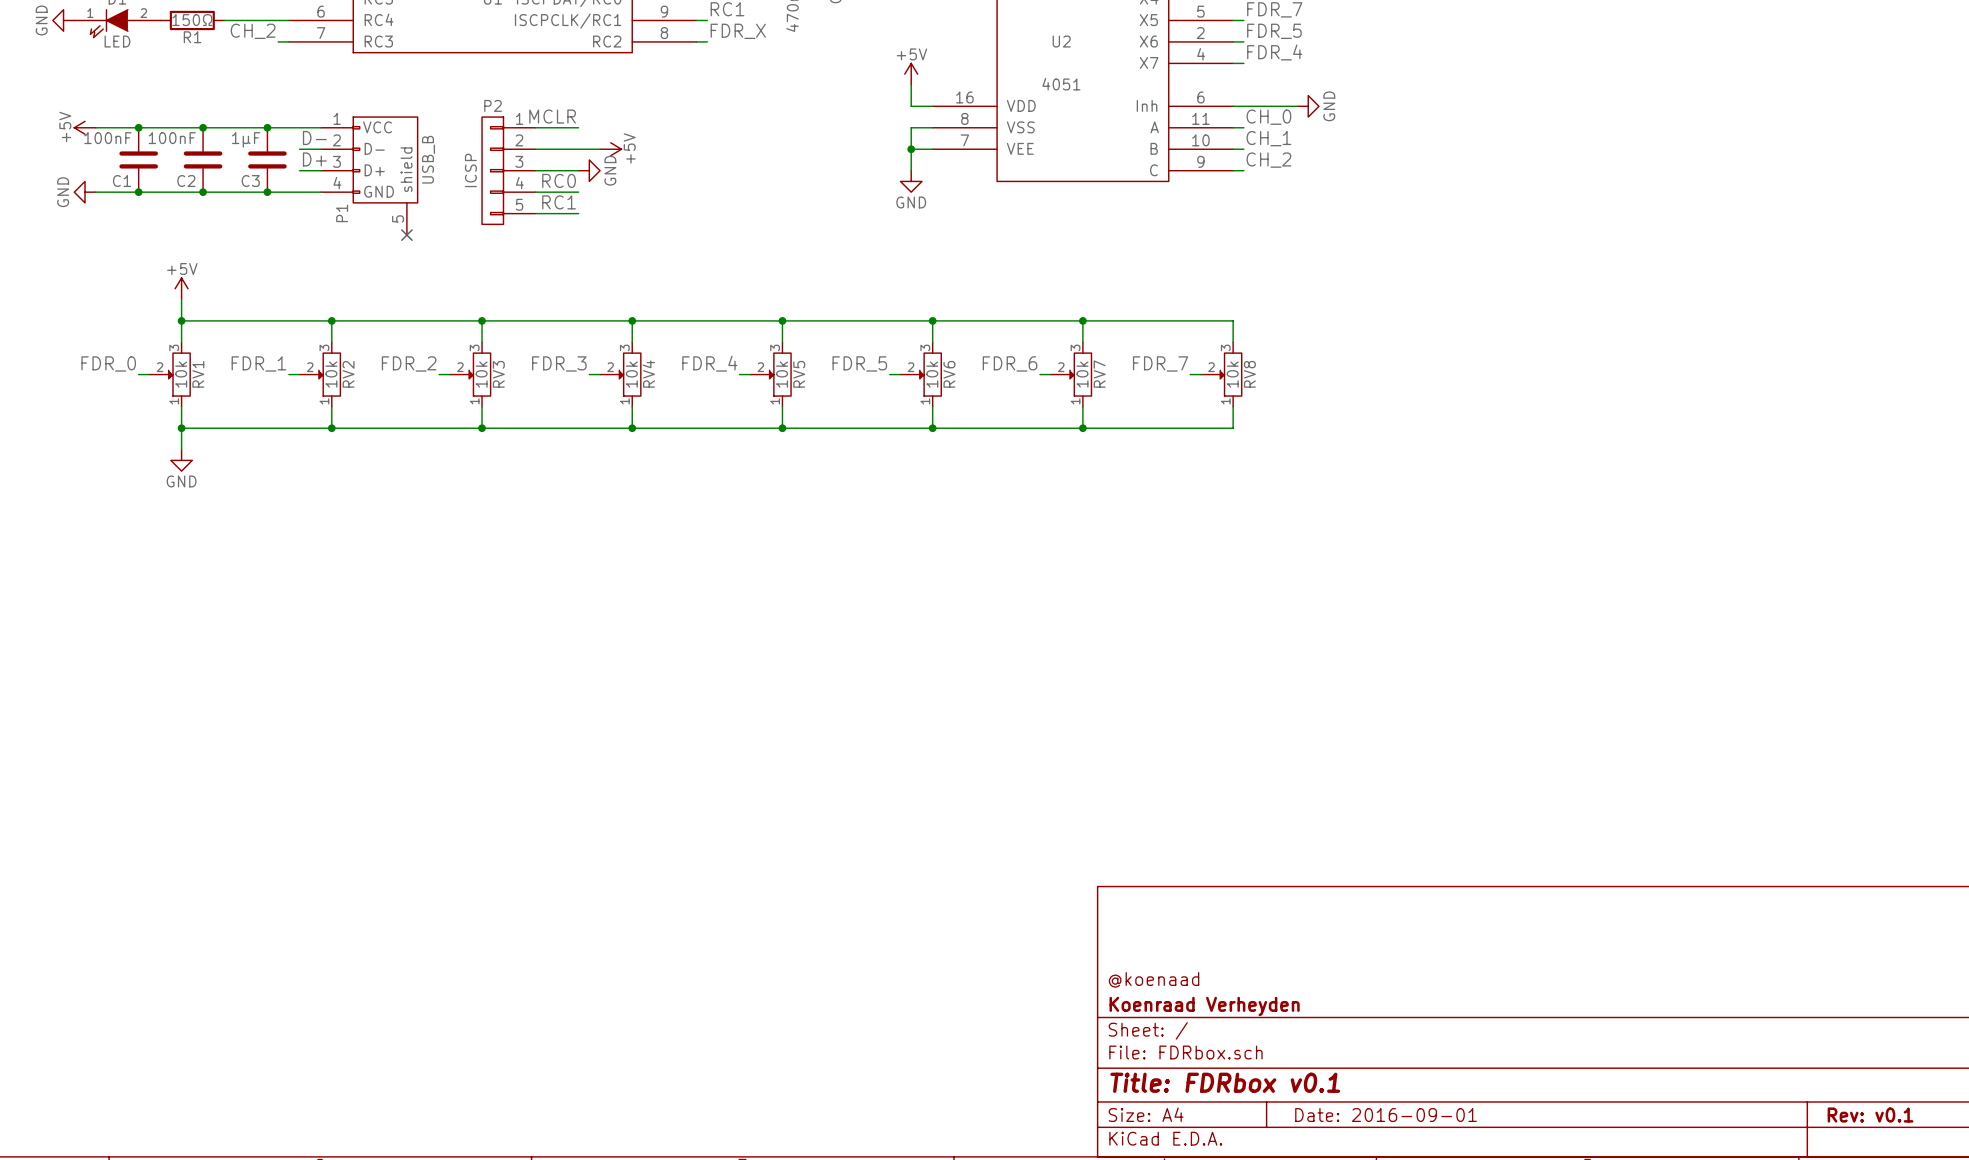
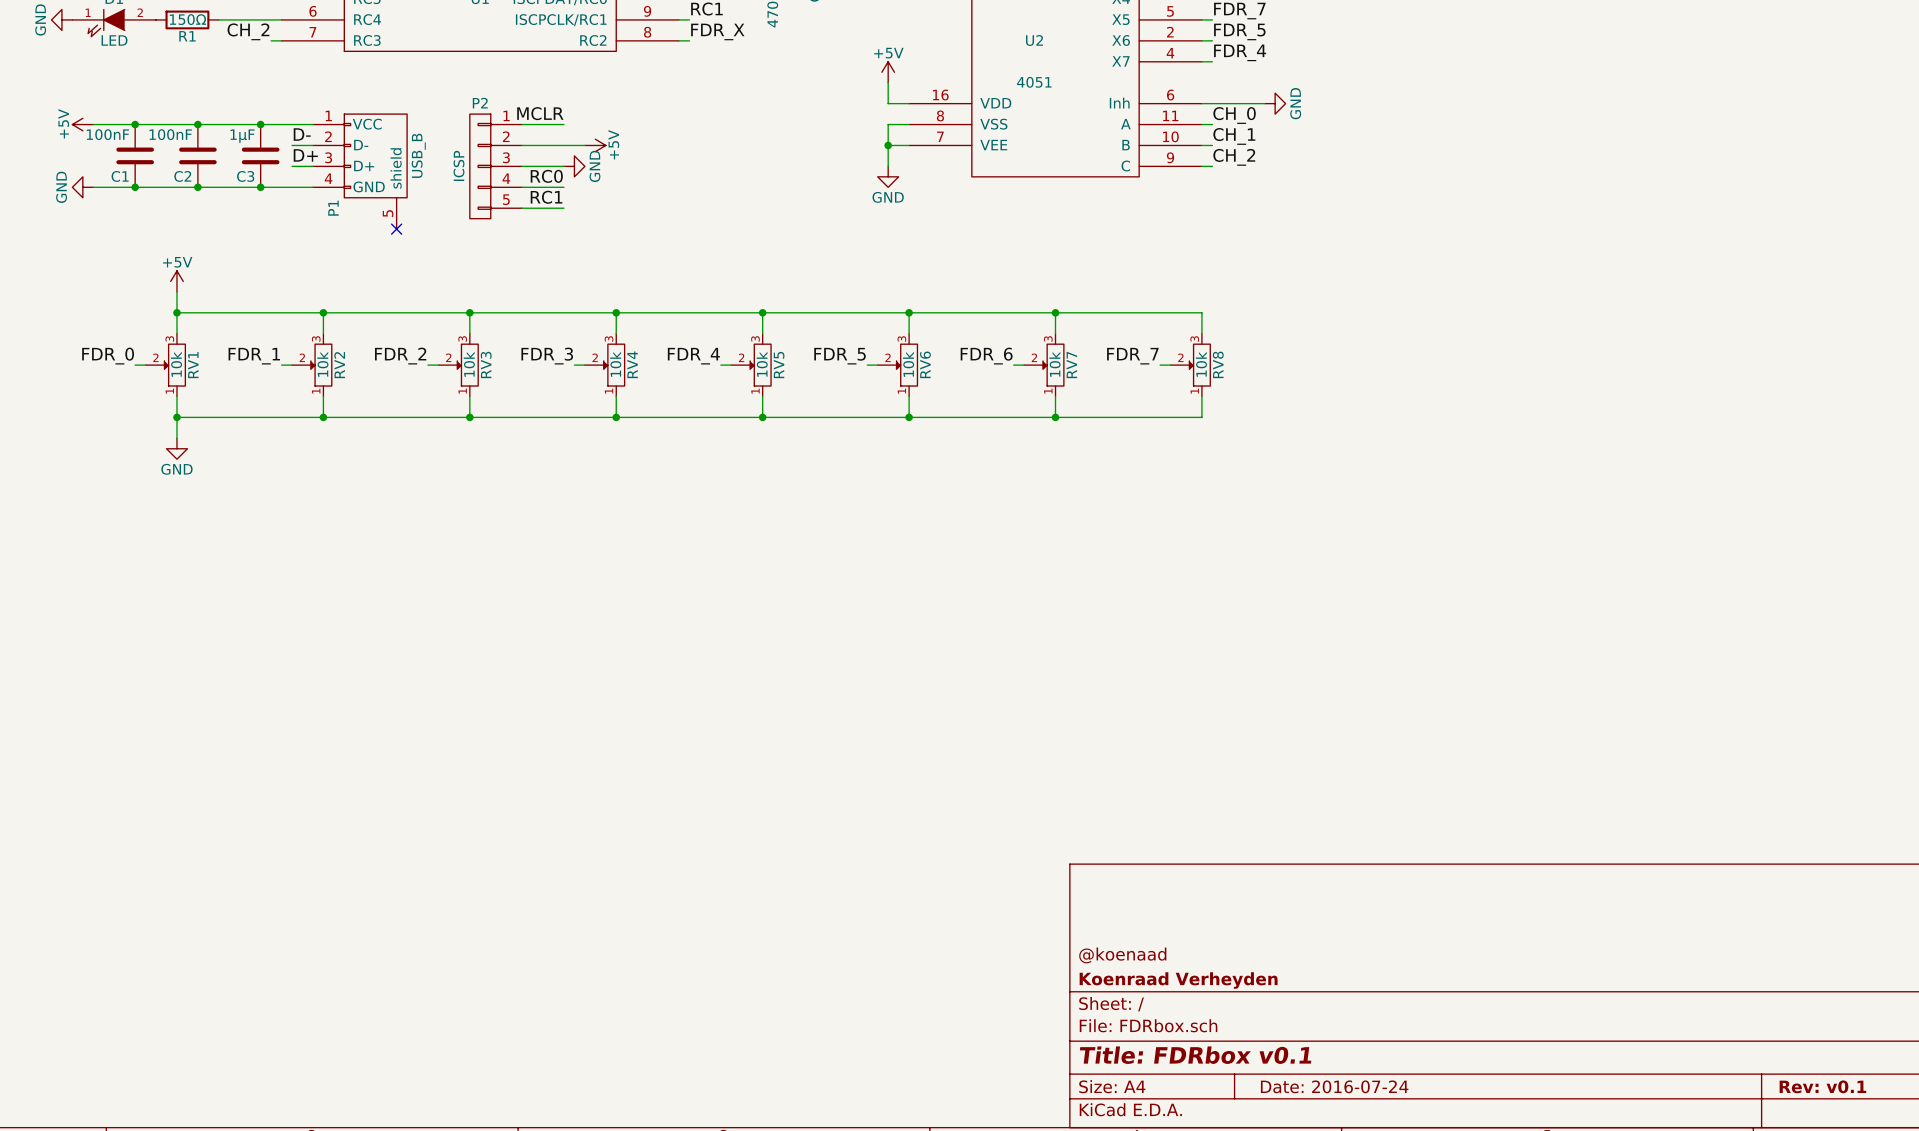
title block: Date: 2016-09-01 (1386, 1115) -> Date: 2016-07-24 (1334, 1086)

